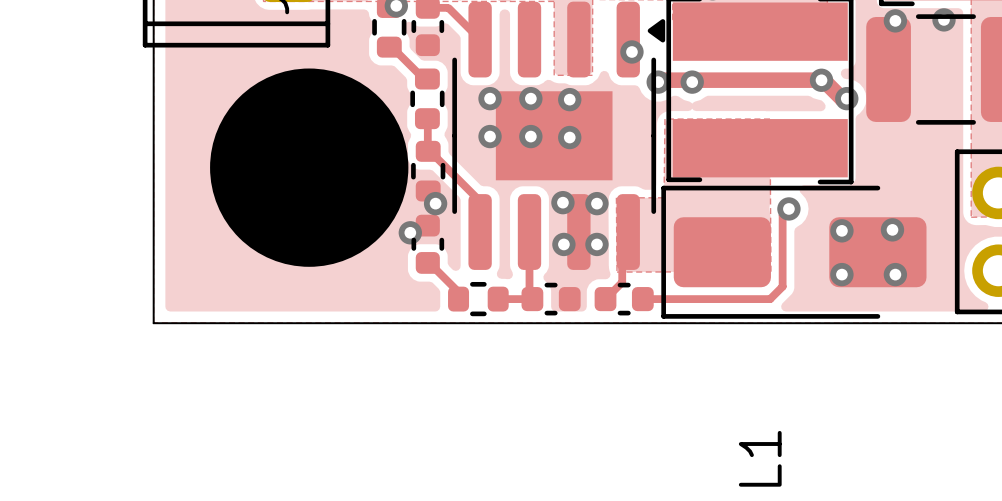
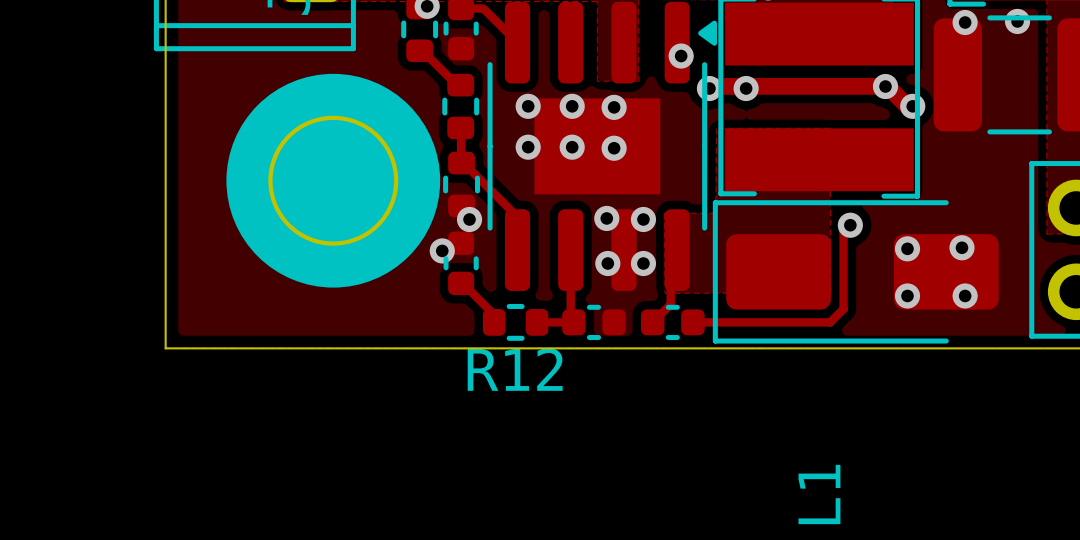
R12 name: none -> R12 (515, 369)

